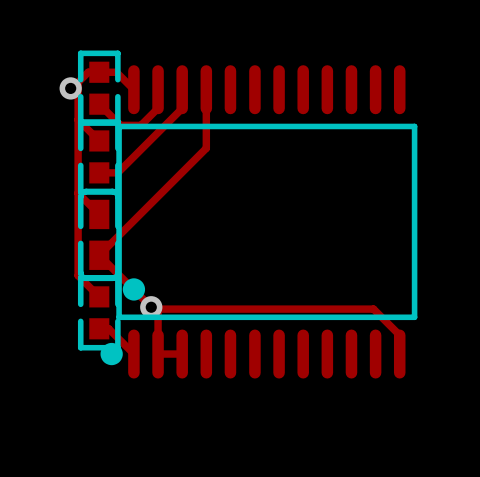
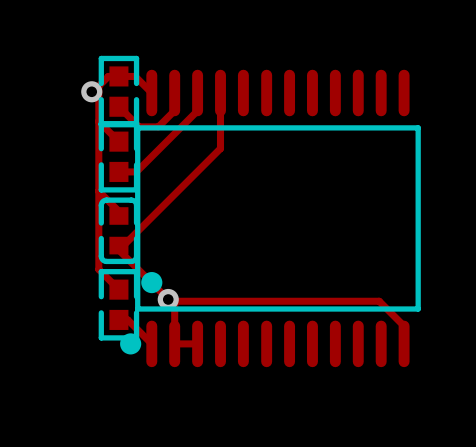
part footprint: [77, 188, 121, 282] -> [98, 197, 140, 265]

